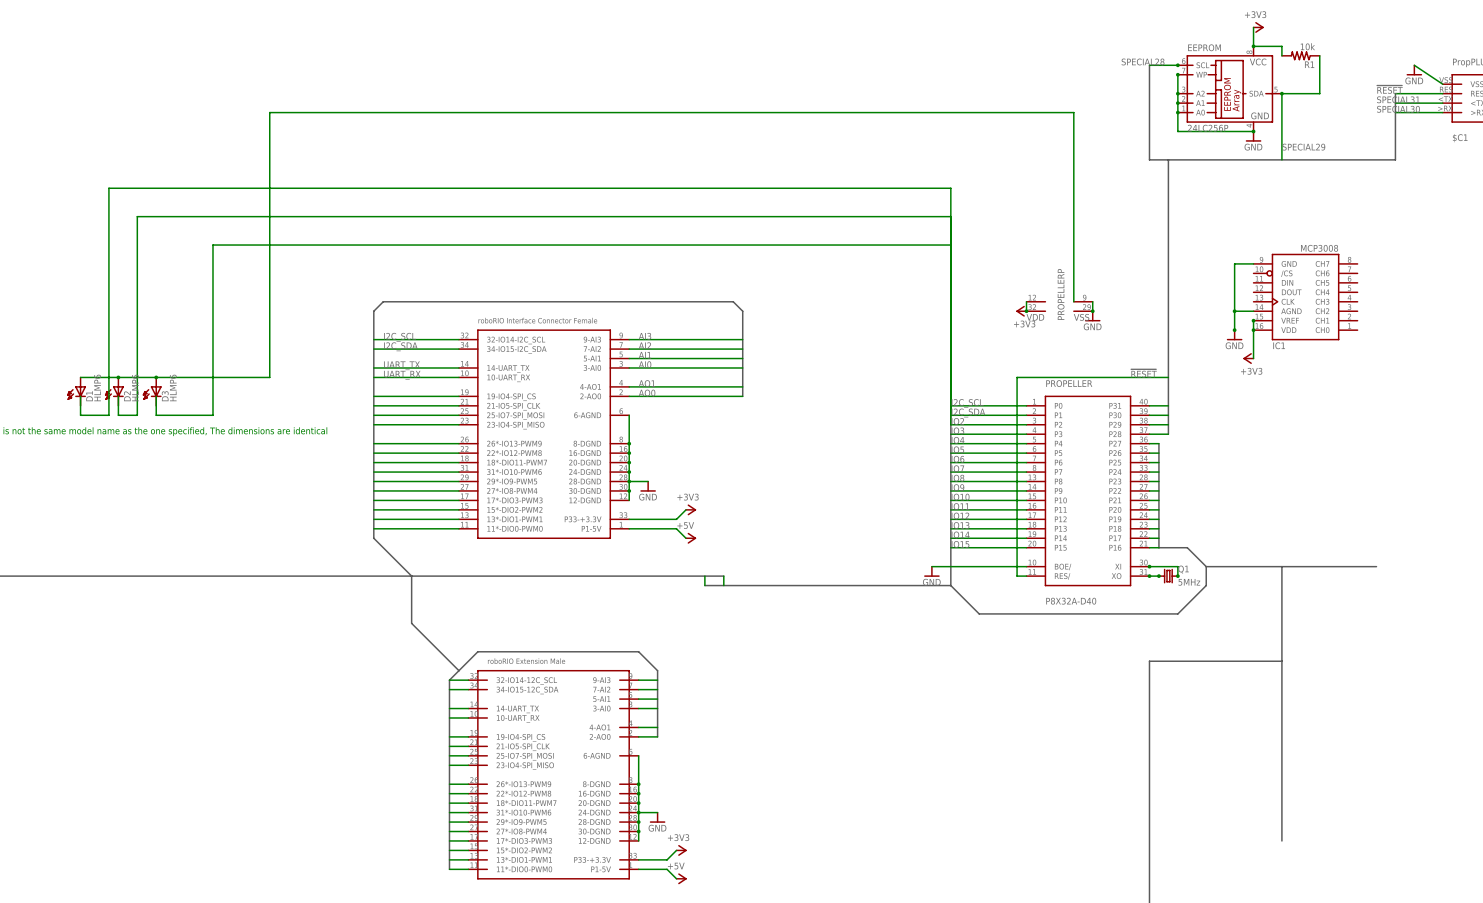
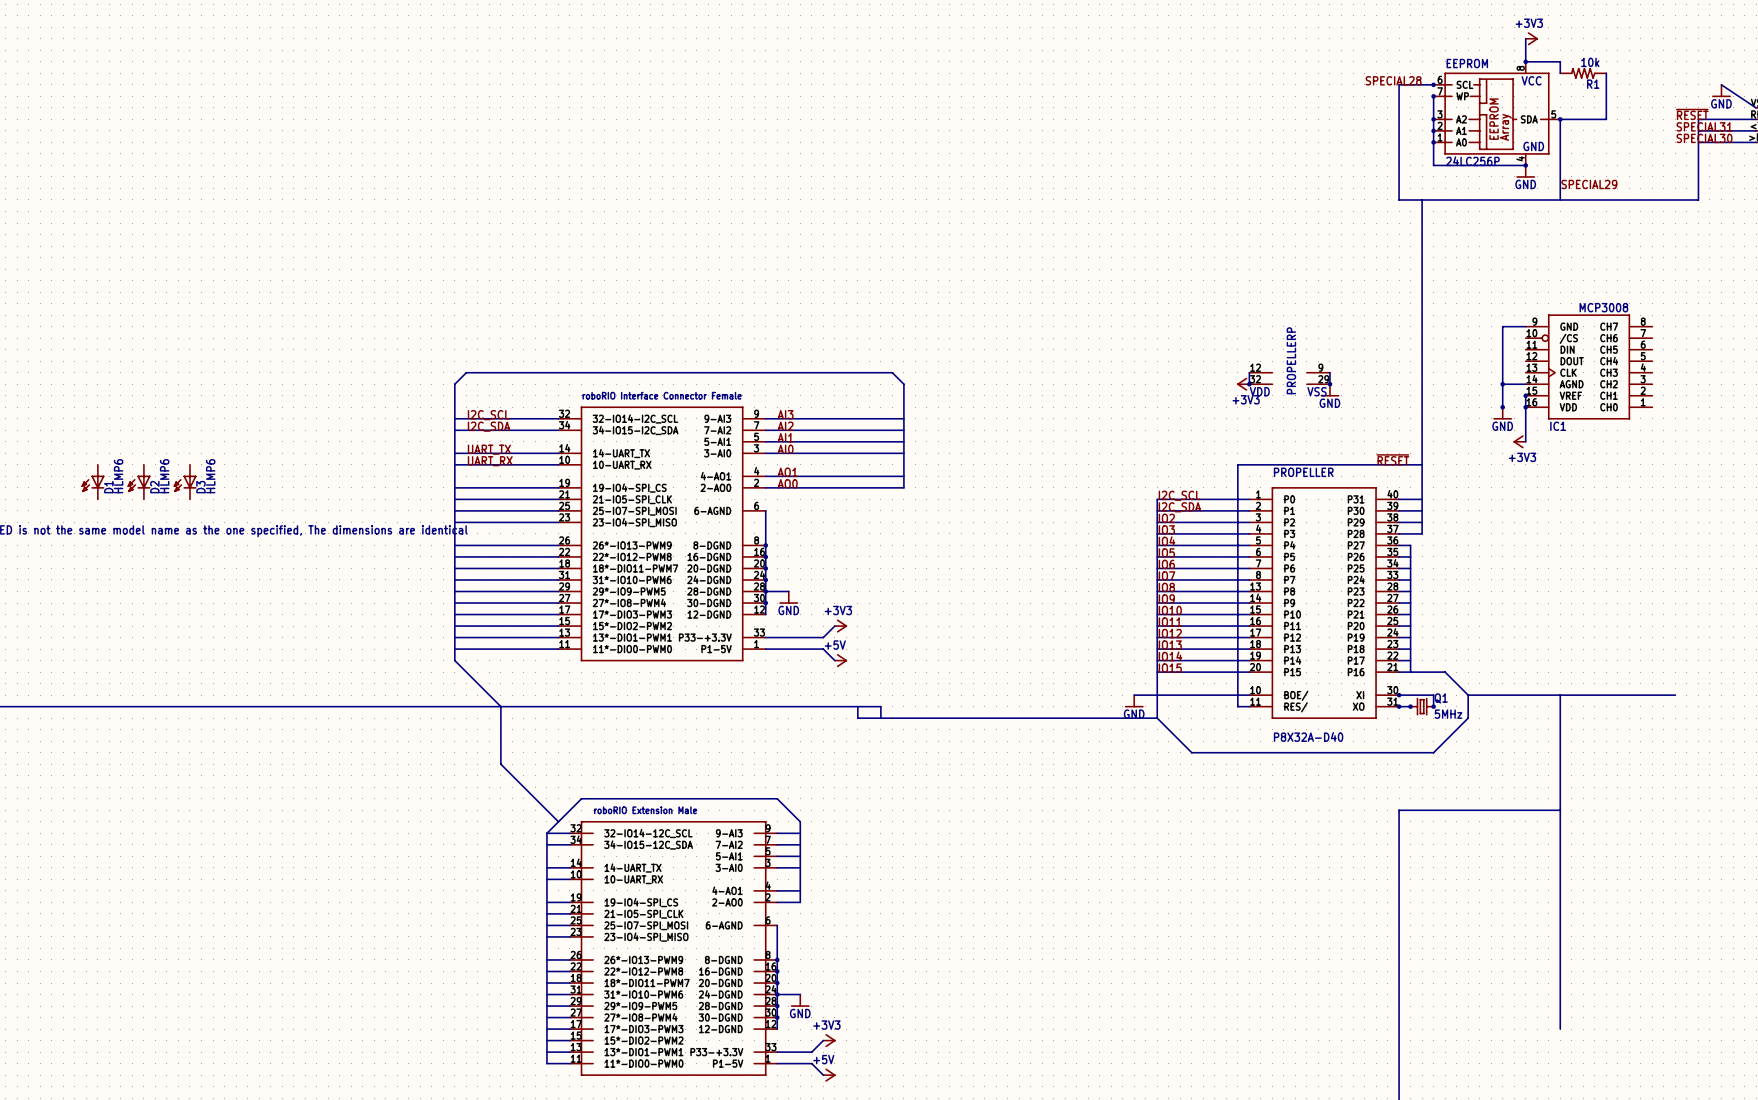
wire: (950, 216) (137, 216) (137, 415) (118, 415) (118, 396) -> none
wire: (950, 245) (212, 245) (212, 415) (156, 415) (156, 396) -> none
wire: (1073, 301) (1073, 112) (269, 112) (269, 377) (80, 377) -> none
junction: (118, 377) -> none
junction: (156, 377) -> none
wire: (80, 396) (80, 415) (108, 415) (108, 188) (950, 188) (950, 424) -> none

